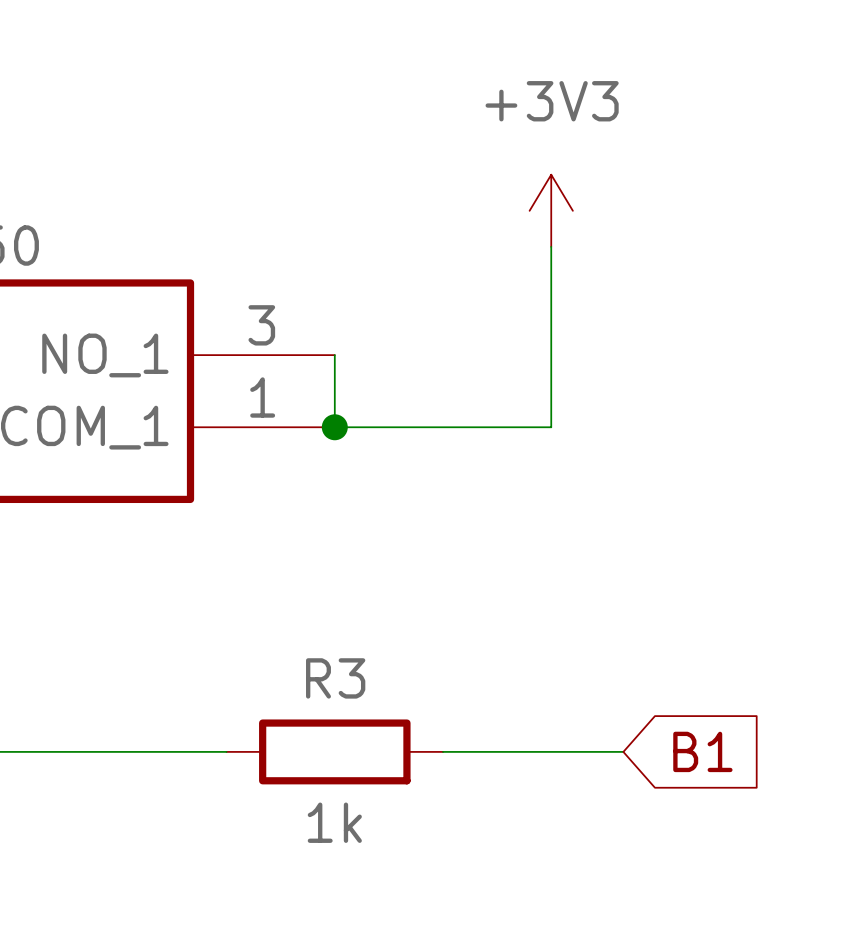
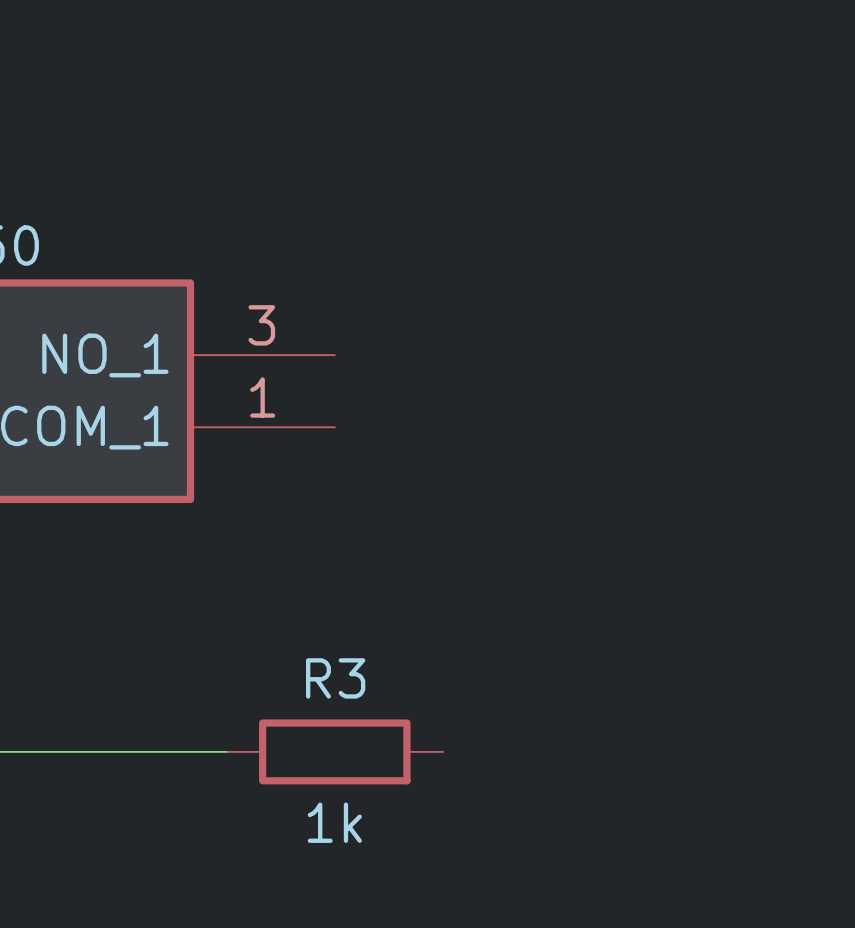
power symbol: +3V3 (551, 210) -> none
wire: (551, 246) (551, 427) (334, 427) (334, 355) -> none
junction: (334, 427) -> none
wire: (443, 751) (623, 751) -> none
global label: B1 (702, 751) -> none

